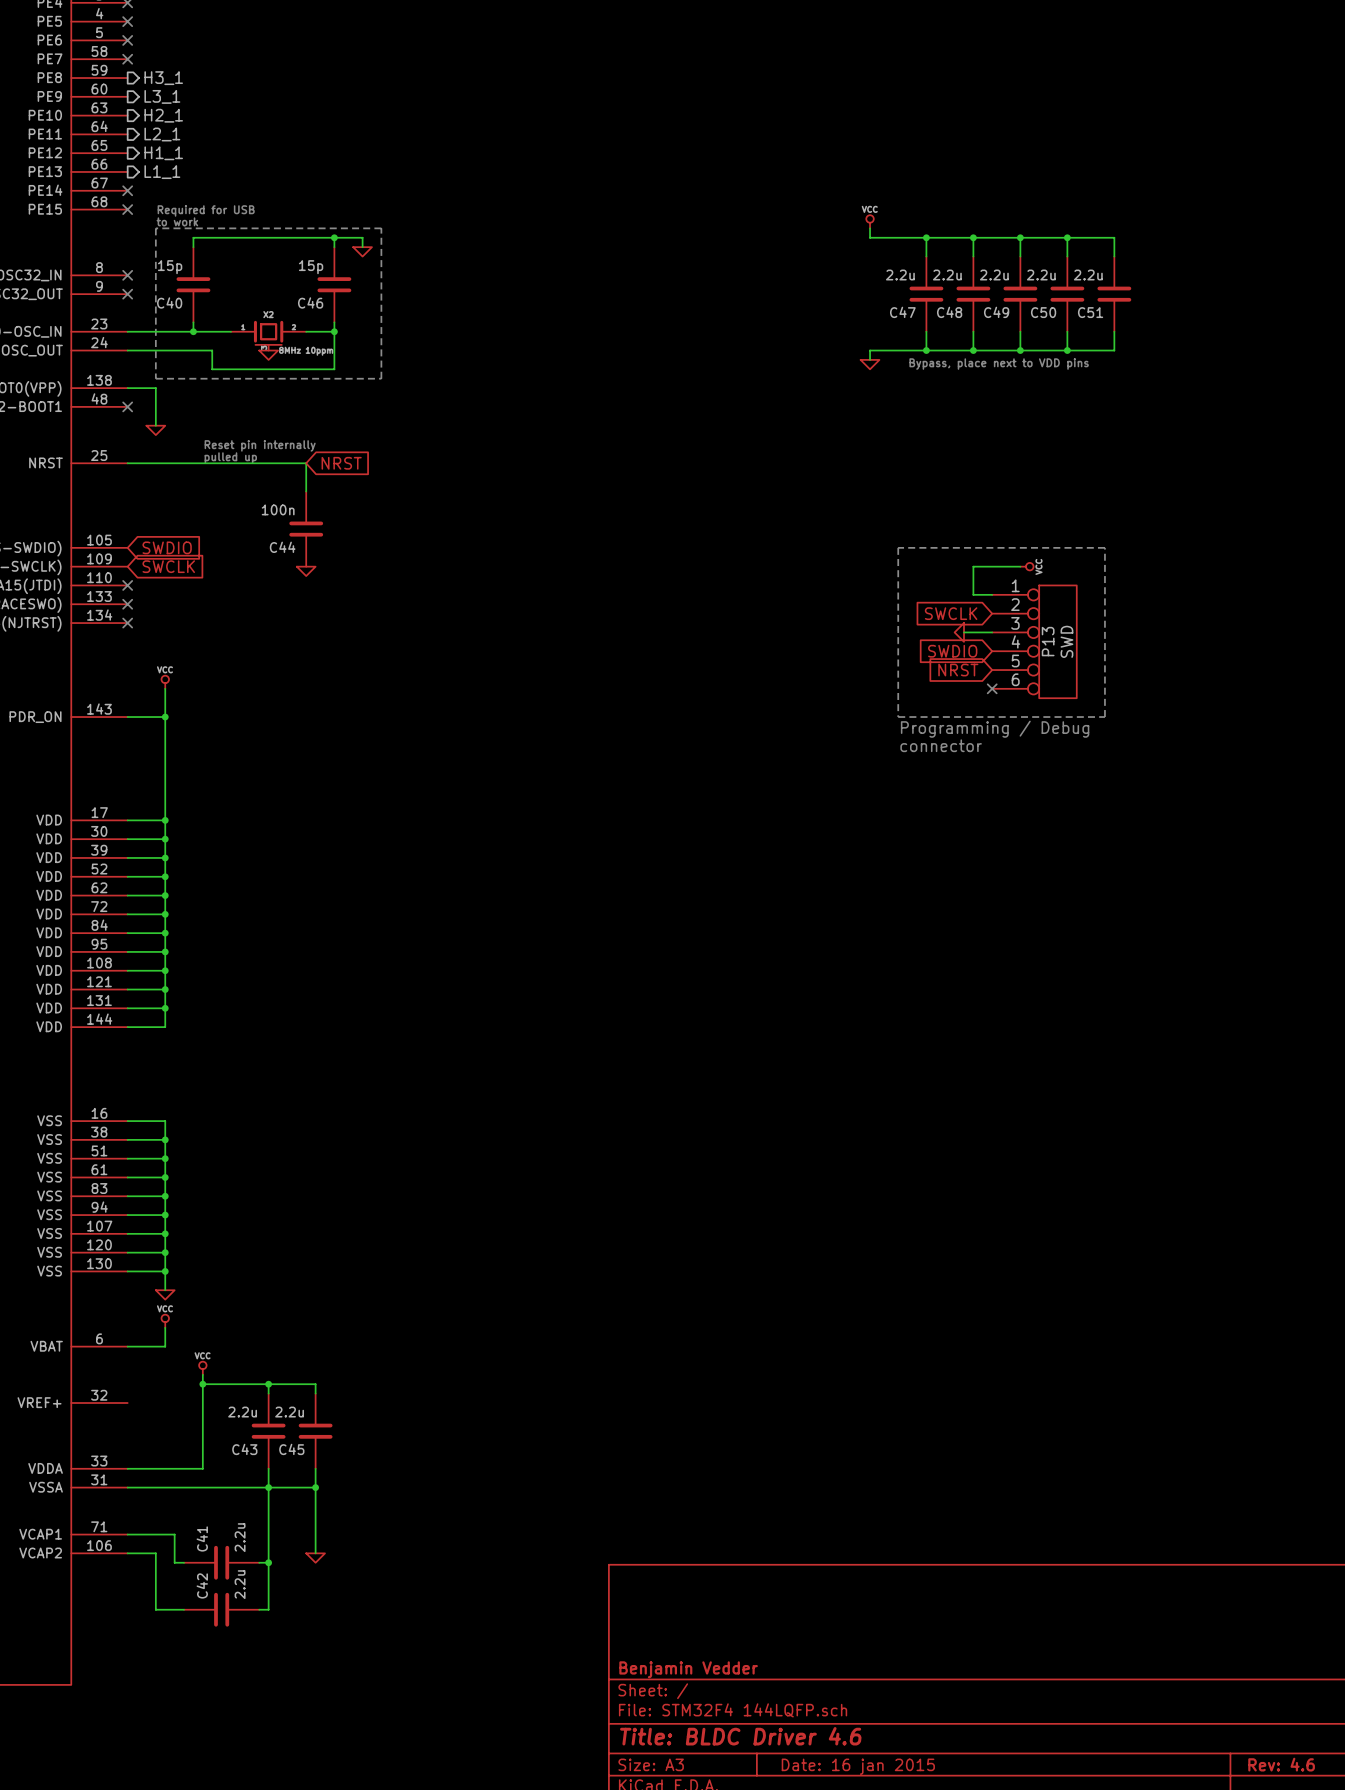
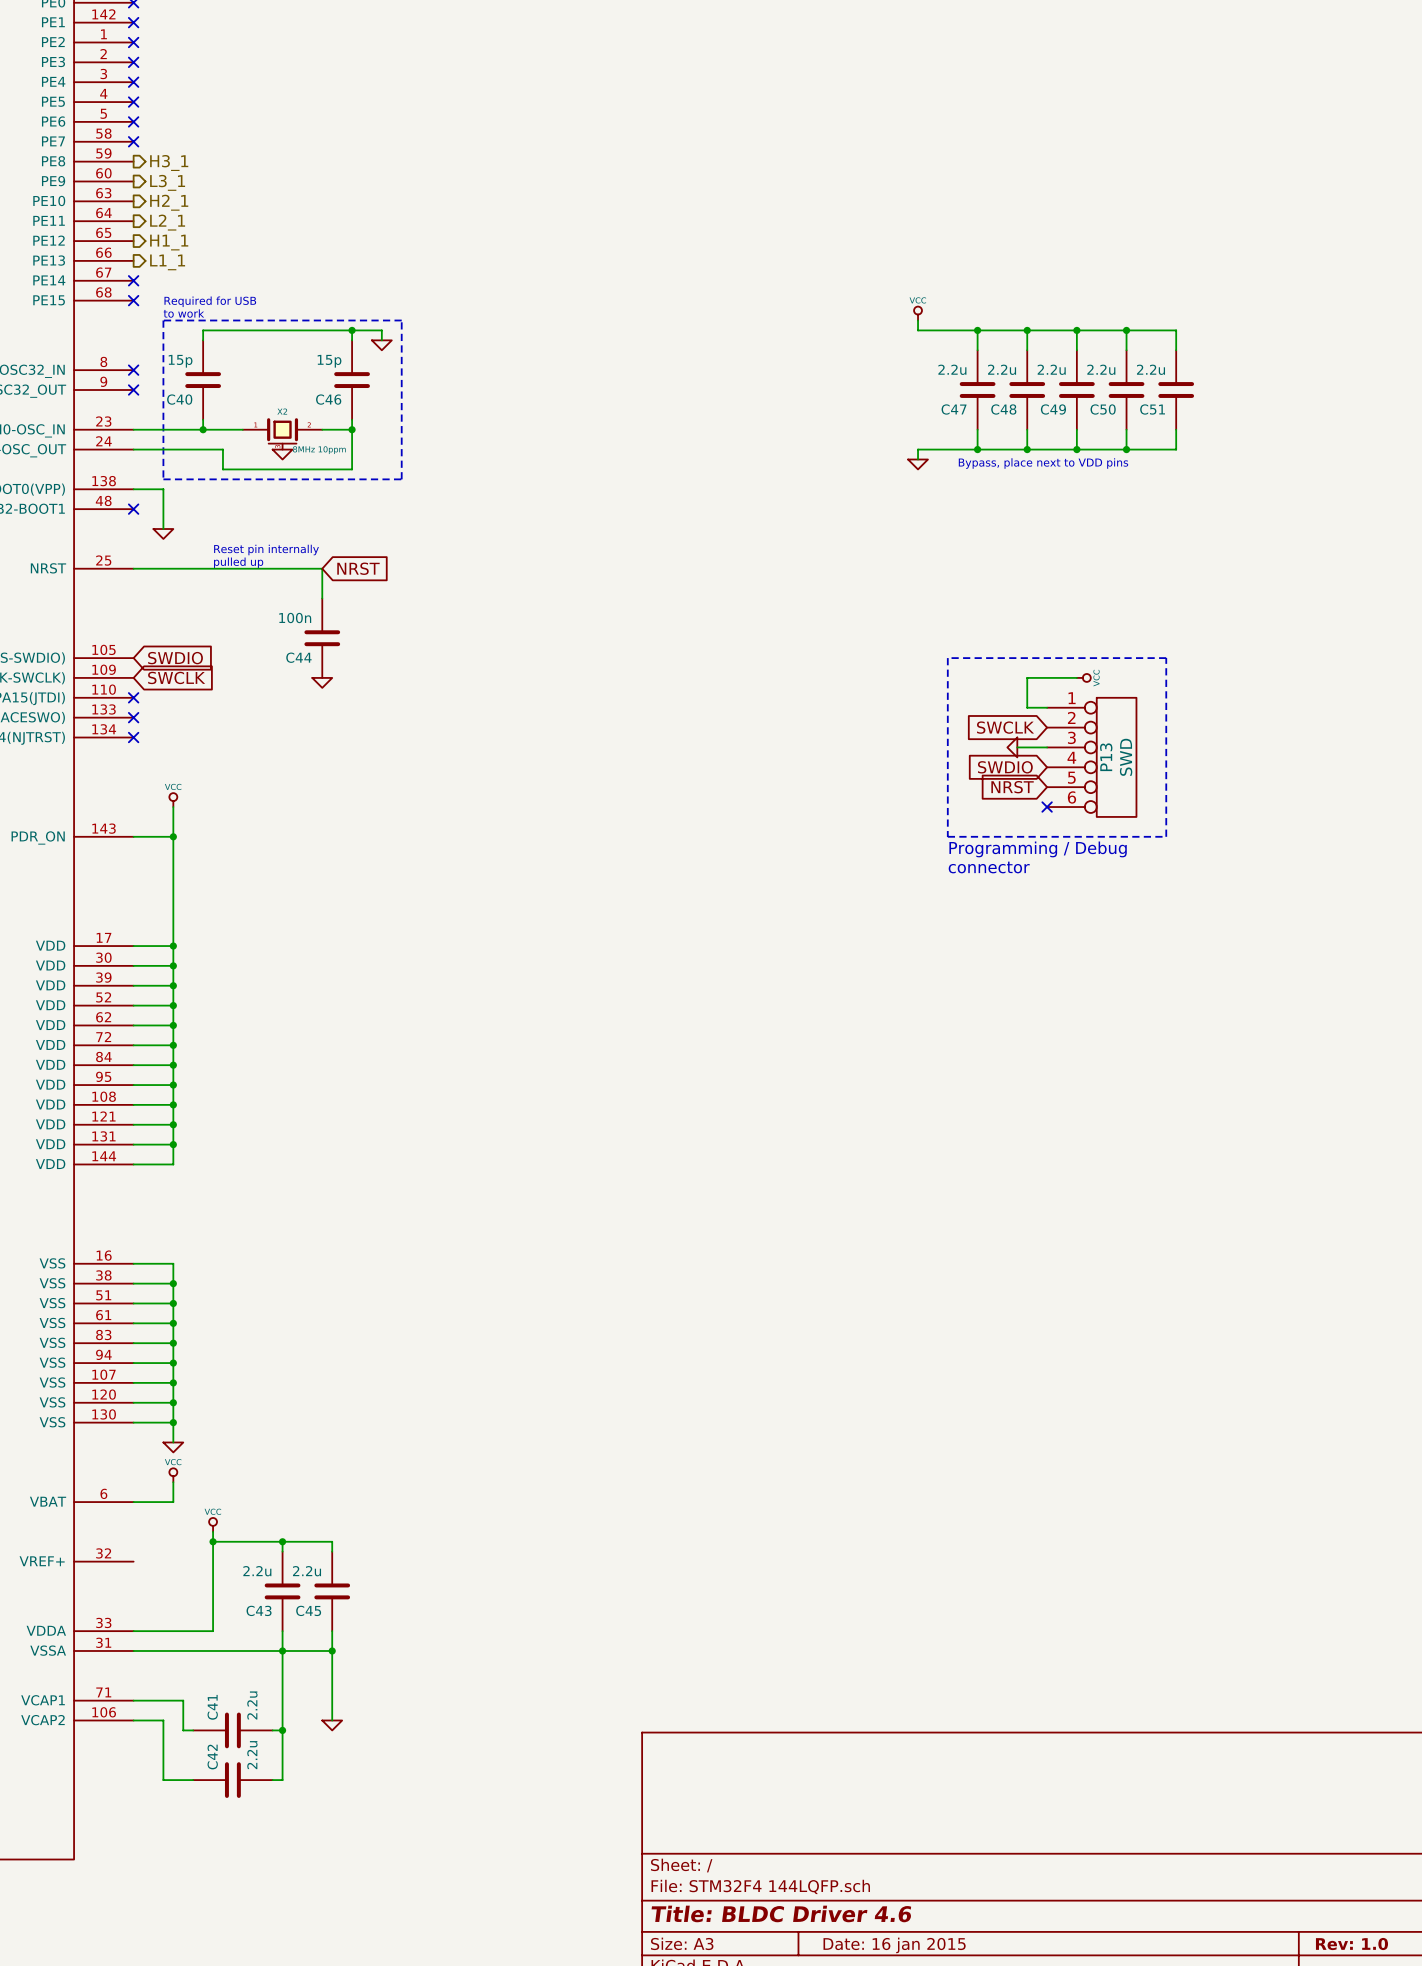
title block: Benjamin Vedder (688, 1669) -> none
title block: Rev: 4.6 (1281, 1764) -> Rev: 1.0 (1351, 1944)

